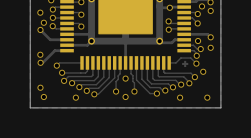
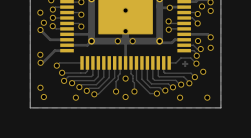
via: none -> (125, 10)
via: none -> (125, 31)
via: none -> (117, 41)
via: none -> (132, 41)

